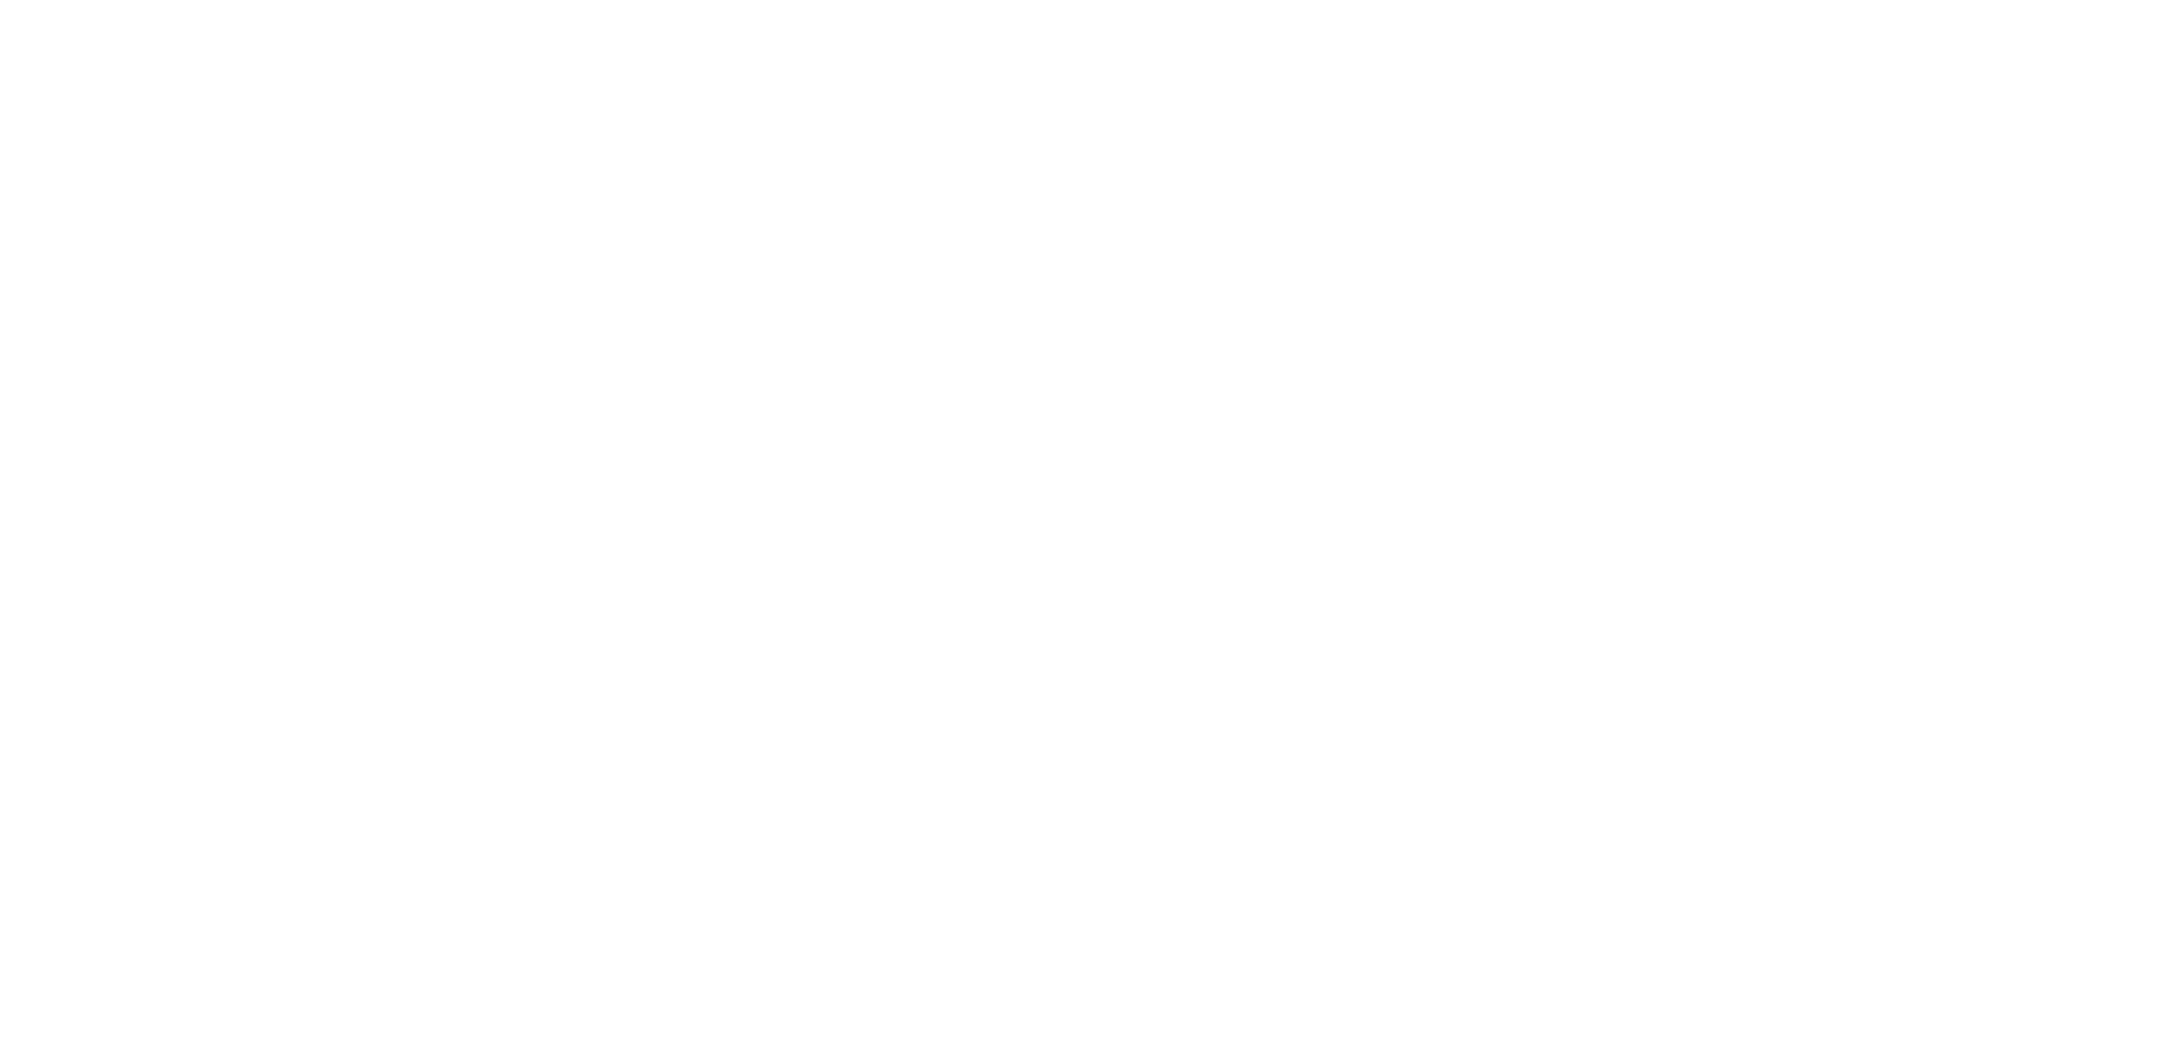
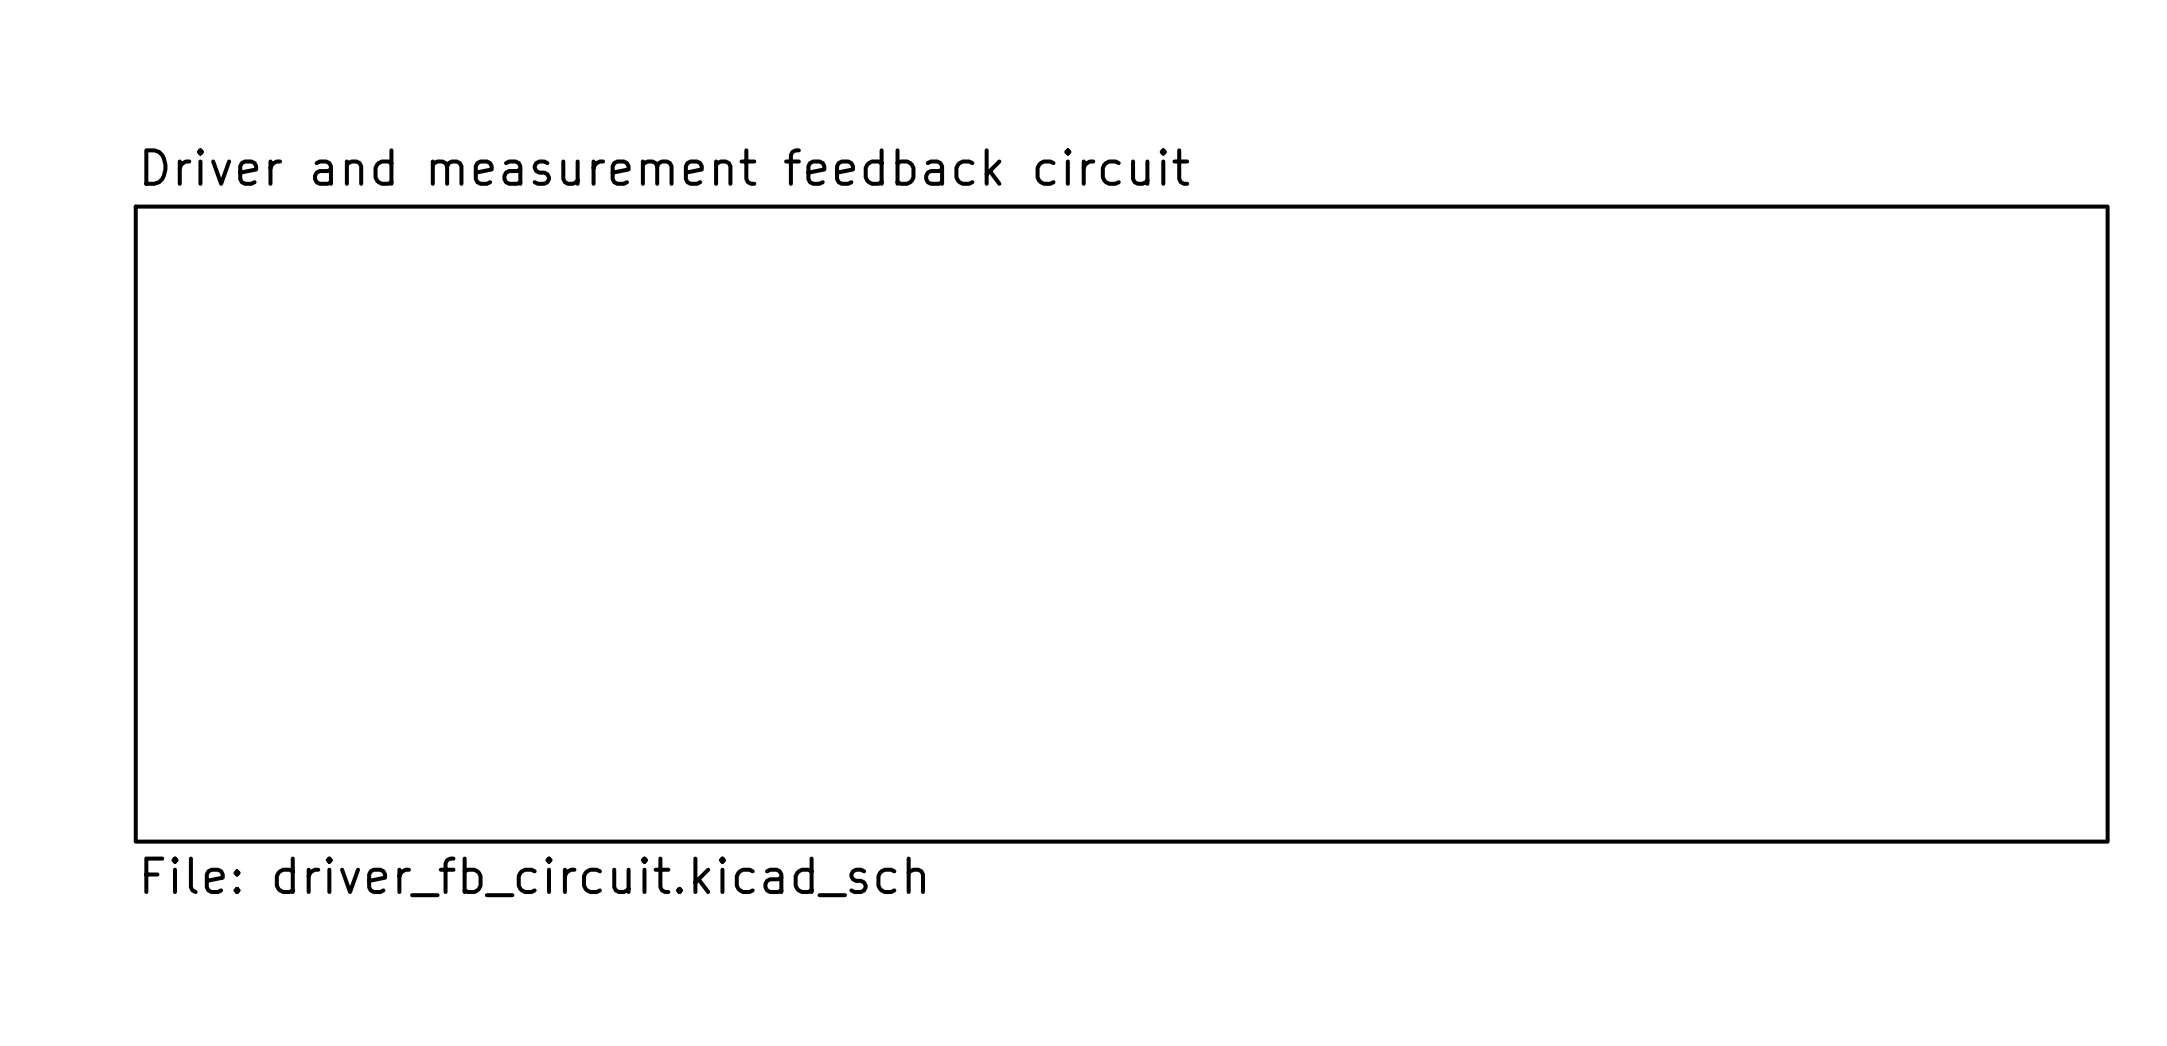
sheet Driver and measurement feedback circuit: none -> File: driver_fb_circuit.kicad_sch (1121, 524)

